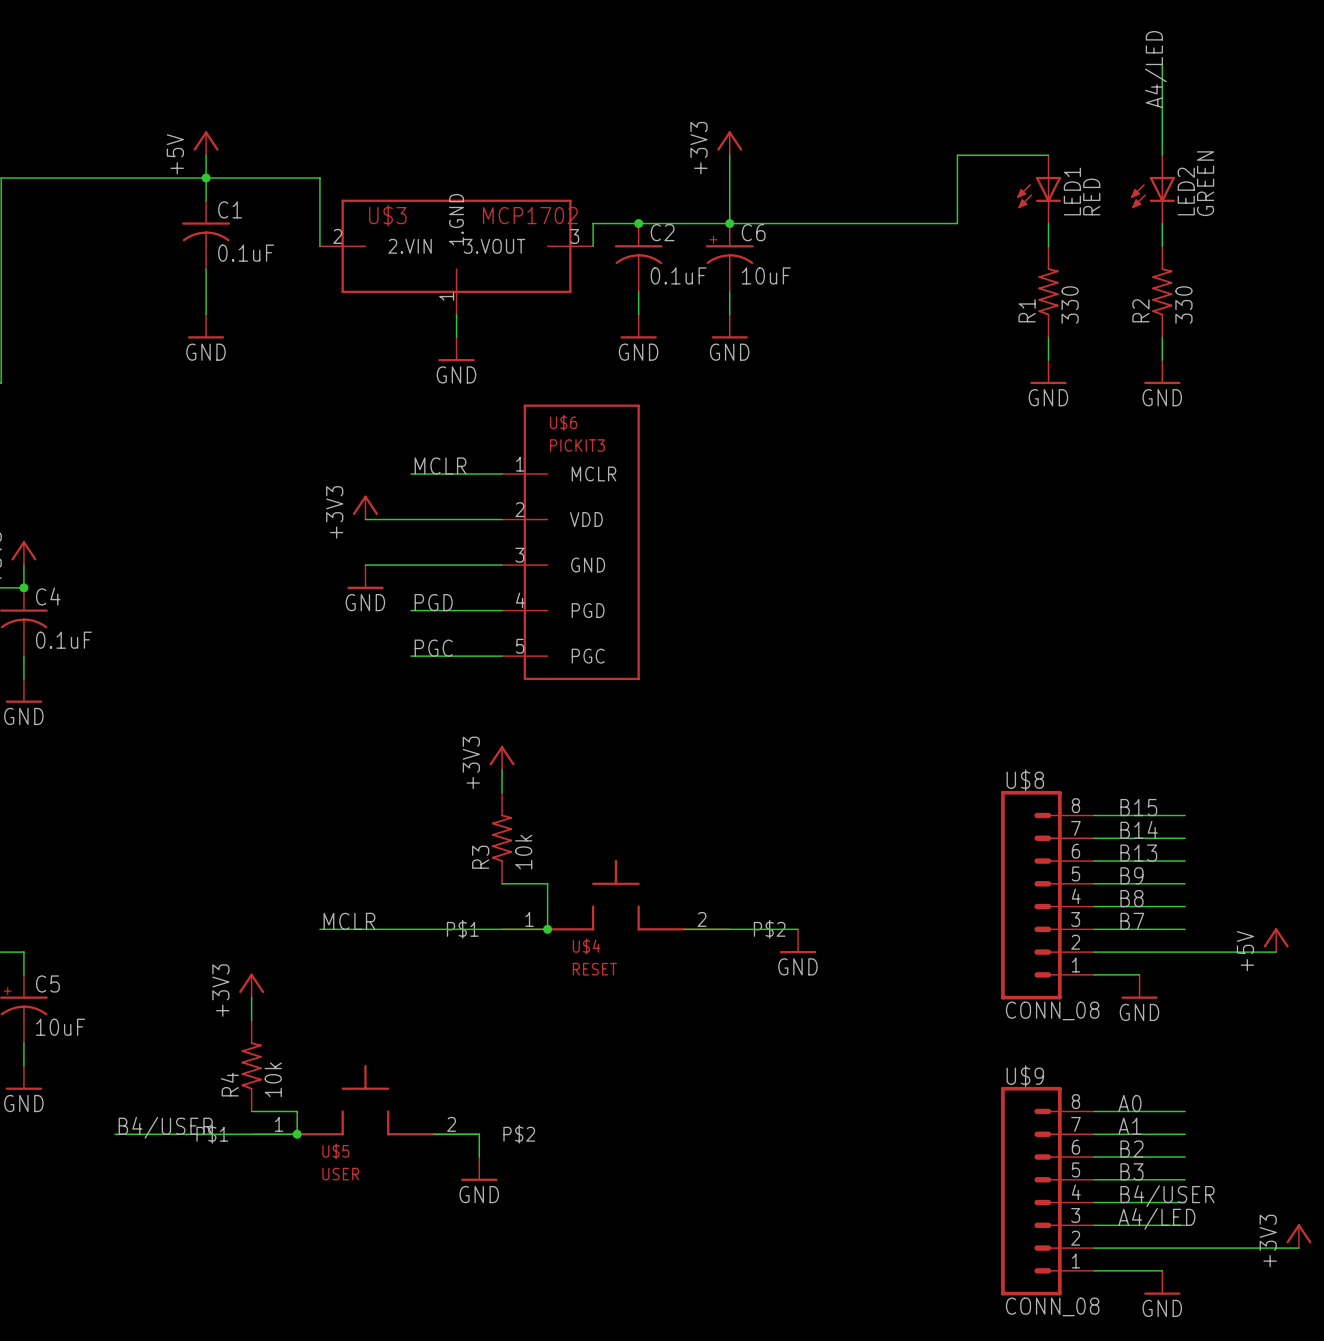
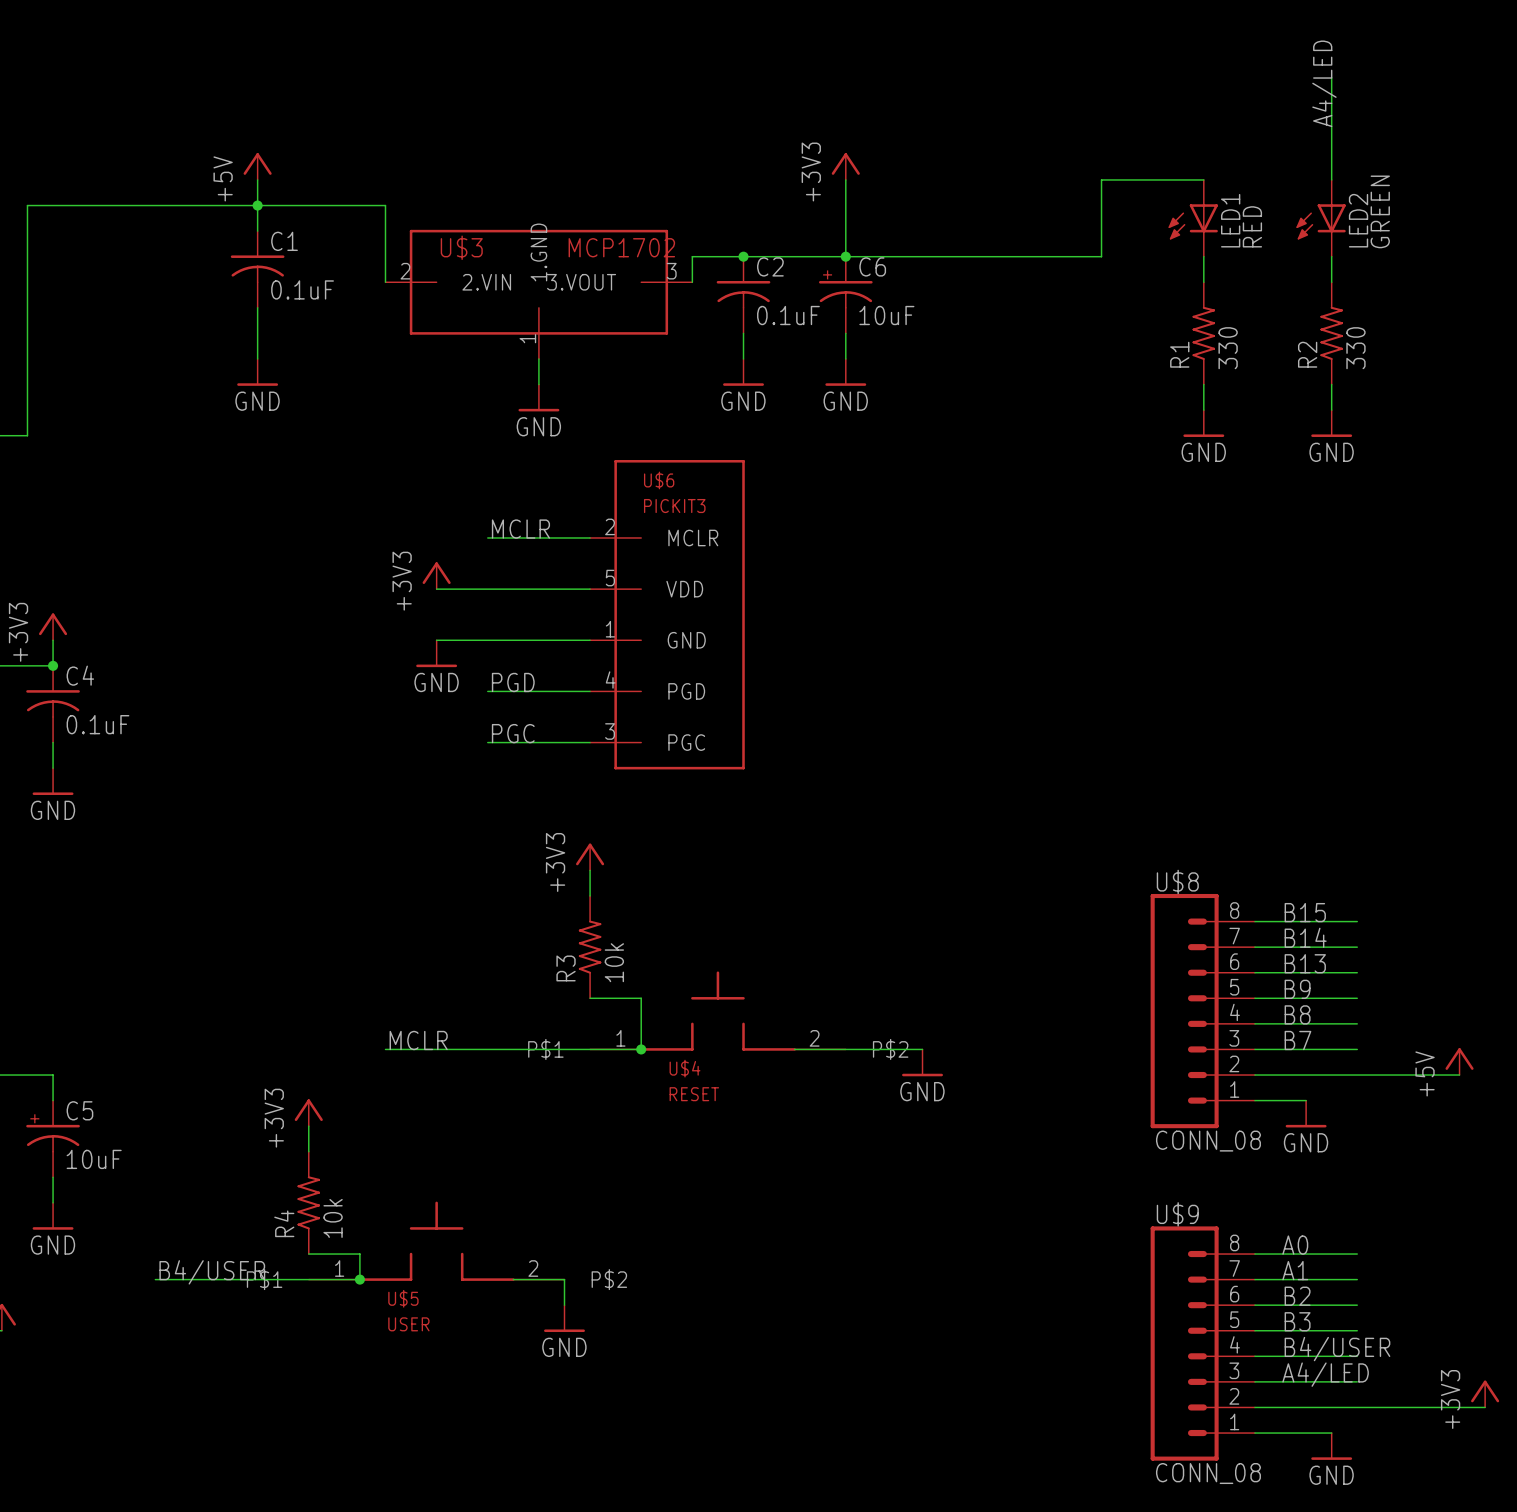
U$6 pin number: 1 (520, 464) -> 2 (610, 526)
U$6 pin number: 2 (519, 509) -> 5 (610, 578)
U$6 pin number: 3 (519, 555) -> 1 (610, 629)
U$6 pin number: 5 (520, 646) -> 3 (610, 731)

